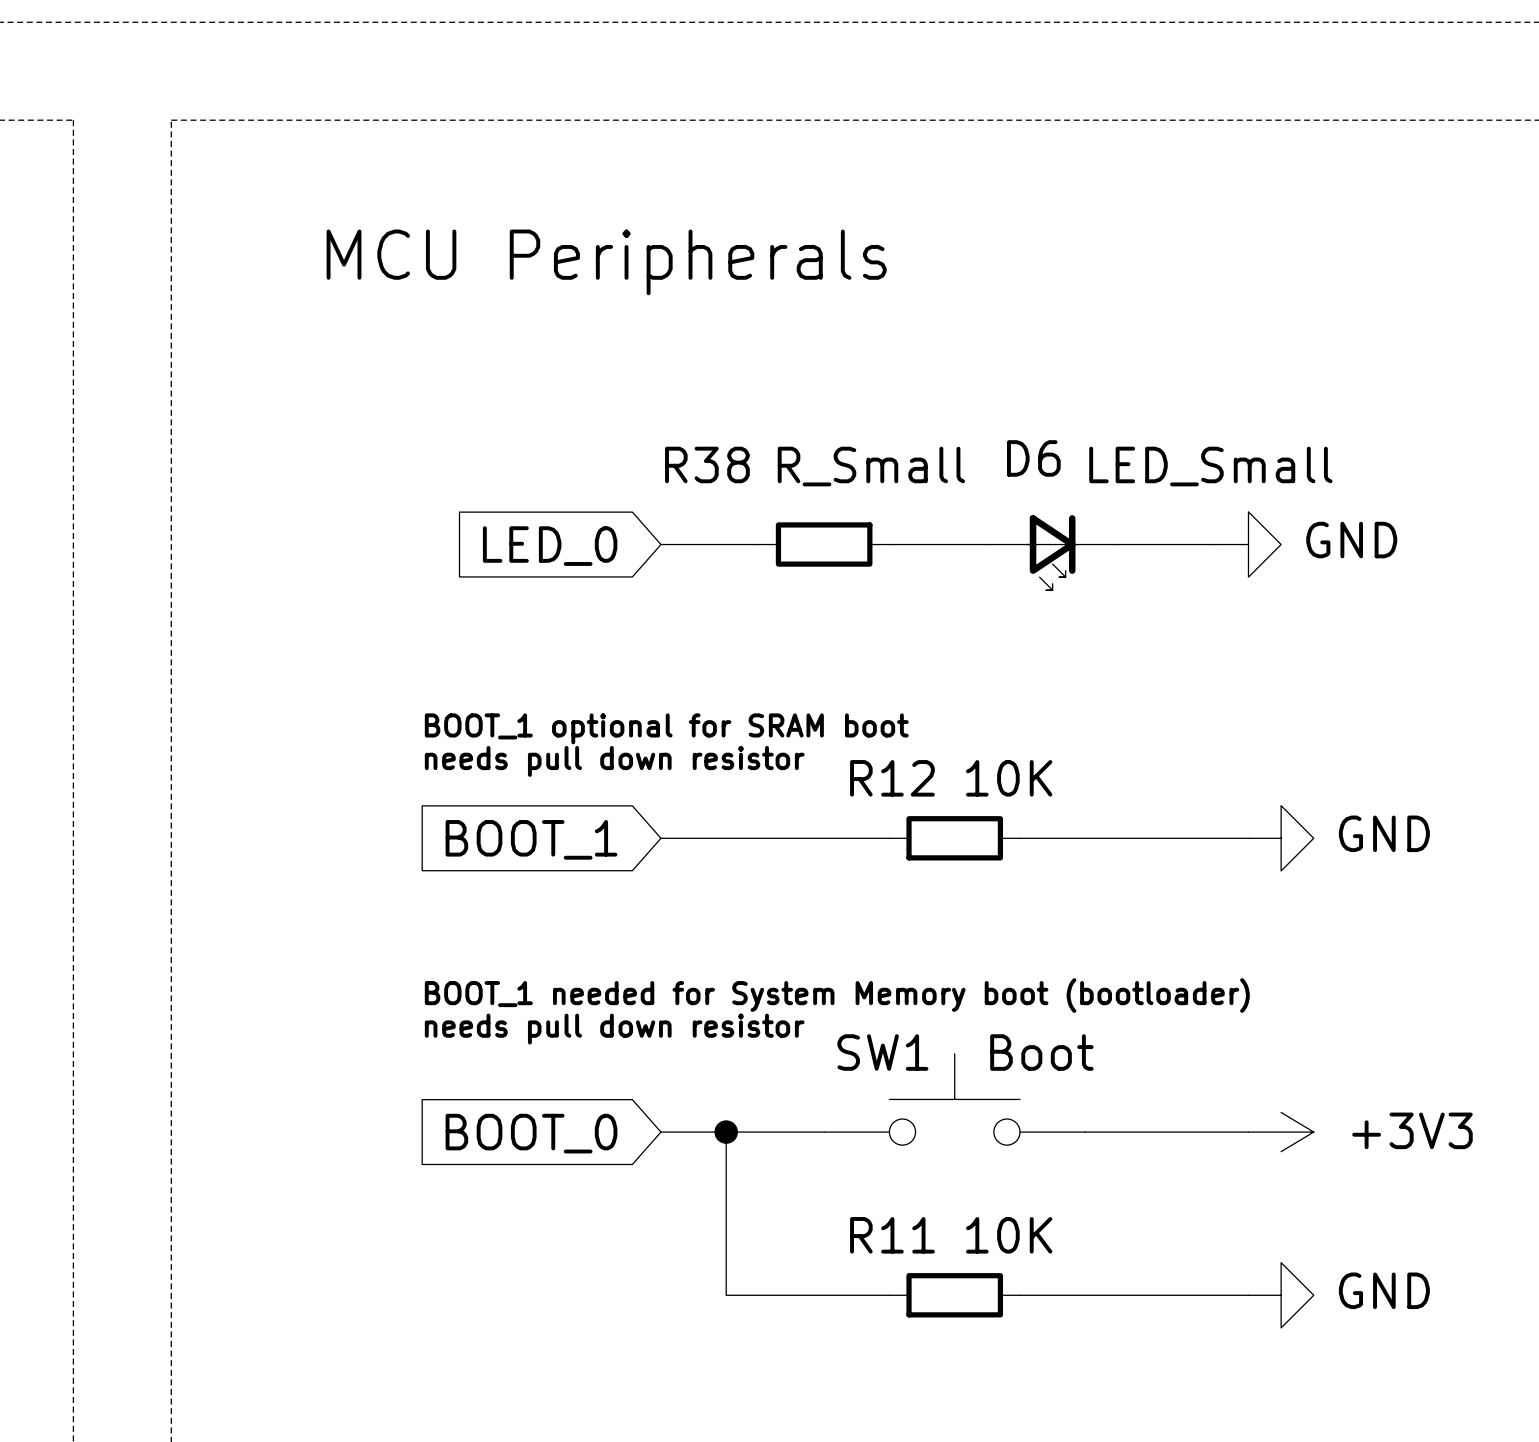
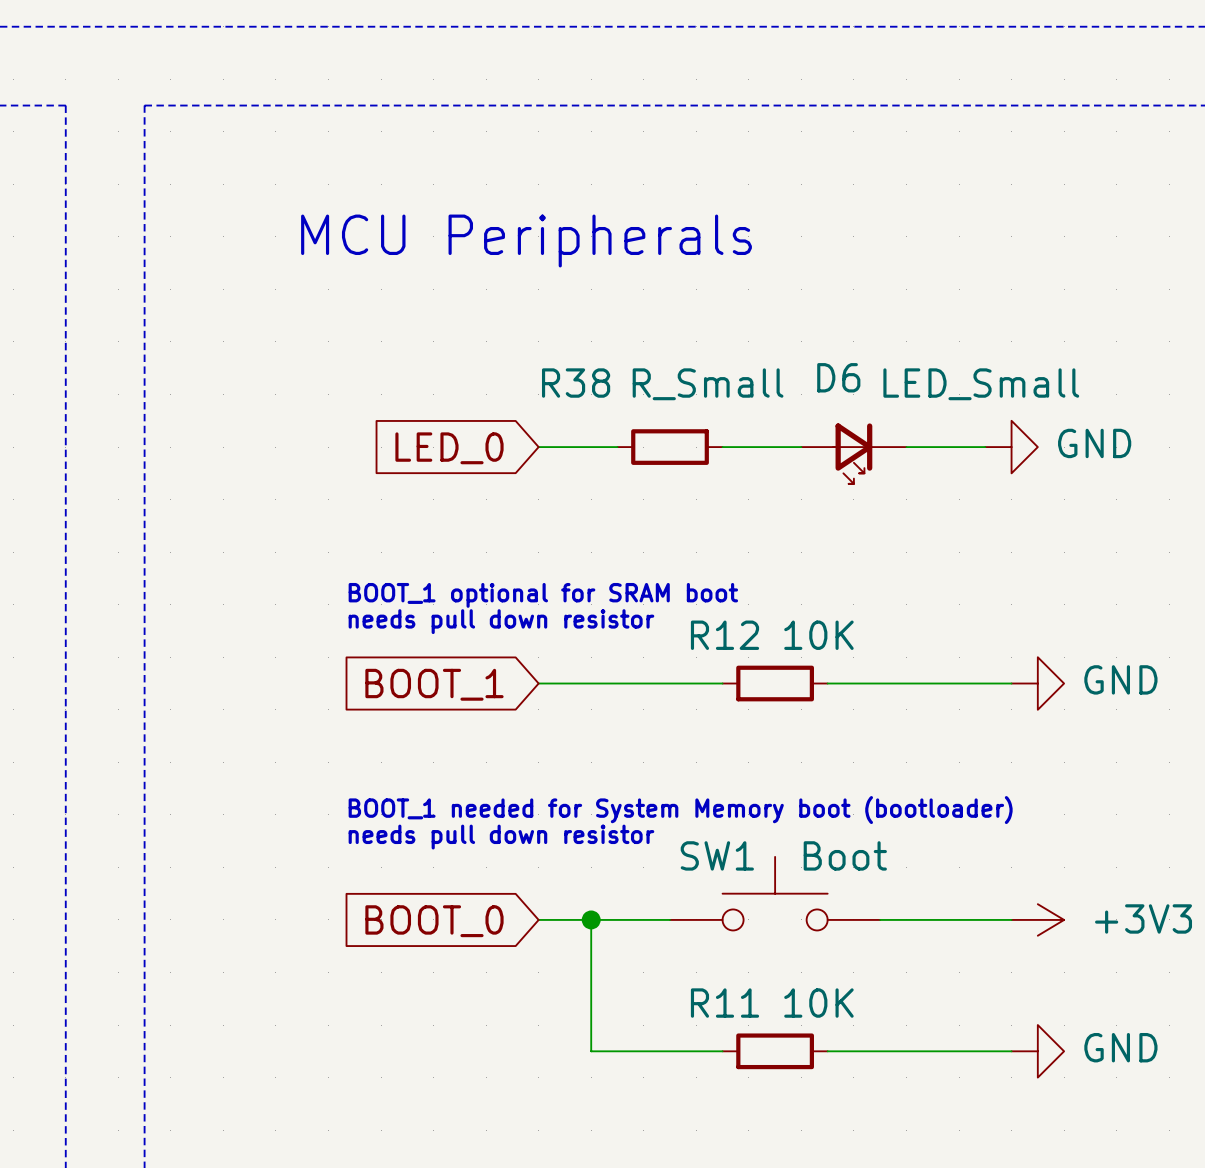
text position: MCU Peripherals (606, 262) -> MCU Peripherals (526, 240)

